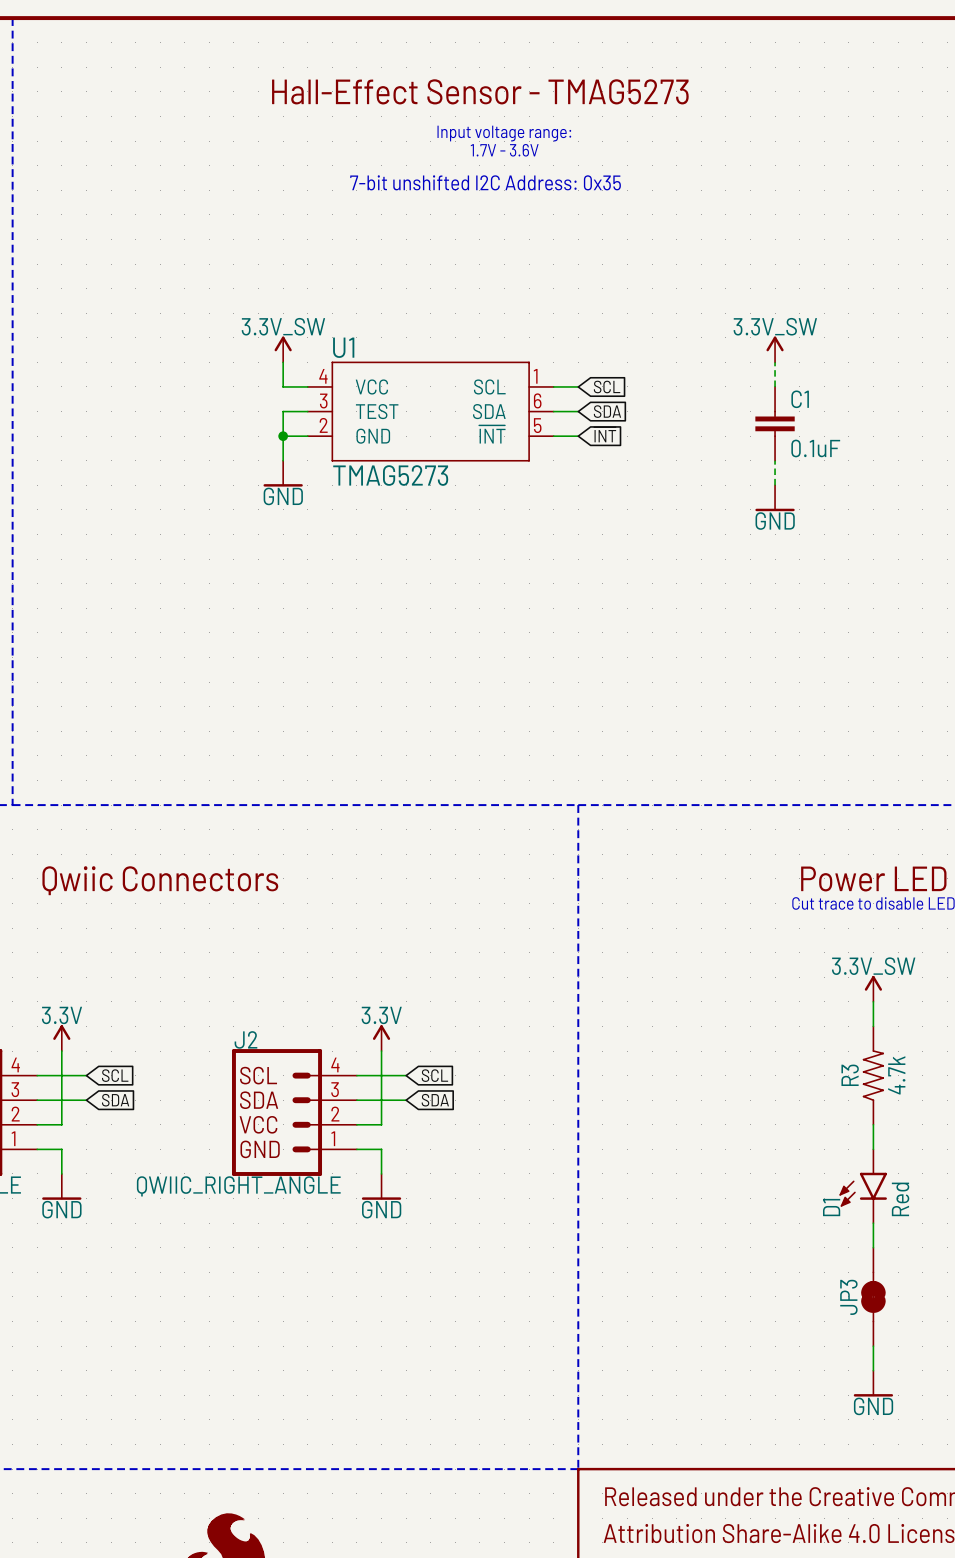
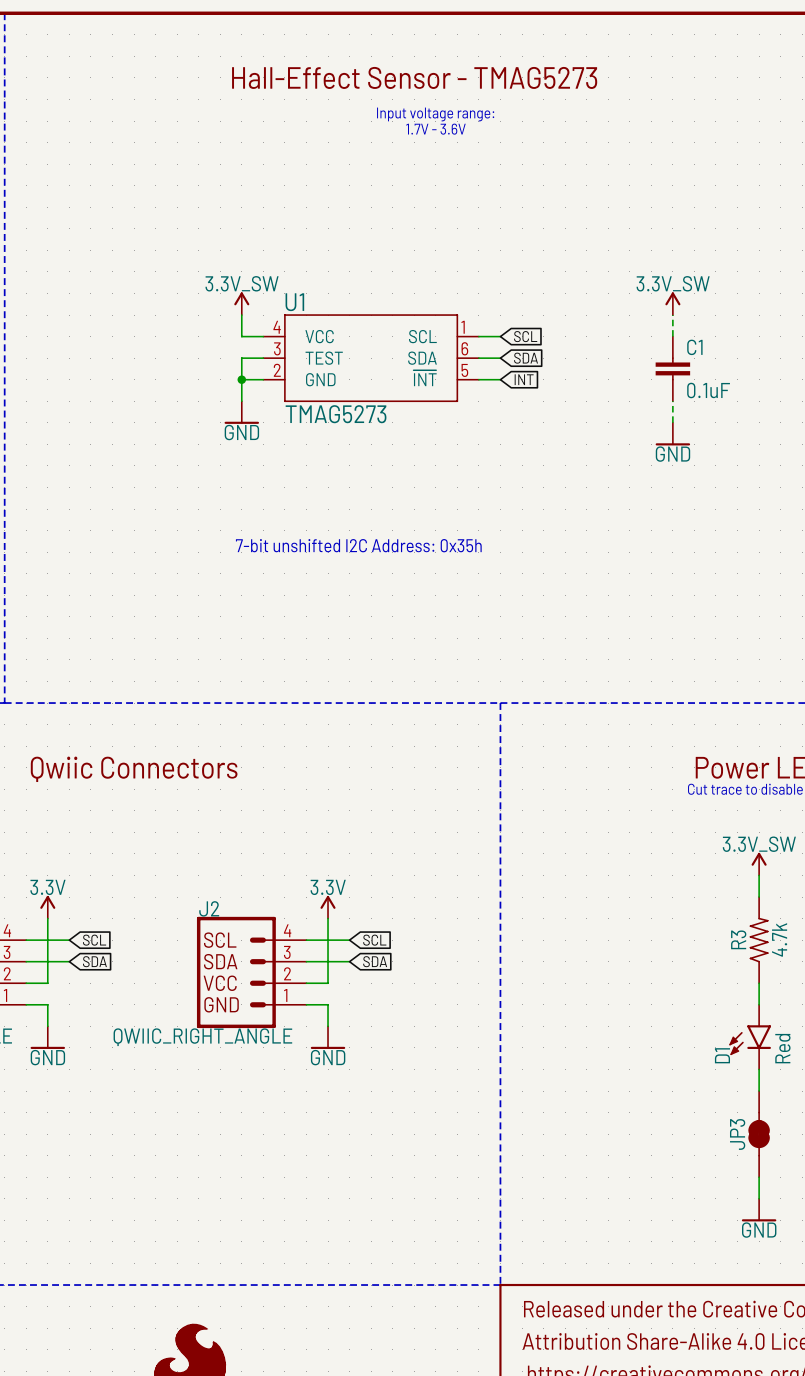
text: 7-bit unshifted I2C Address: 0x35 (485, 182) -> none
global label: ~{INT} (605, 434) -> INT (524, 379)
text: none -> 7-bit unshifted I2C Address: 0x35h (358, 545)

